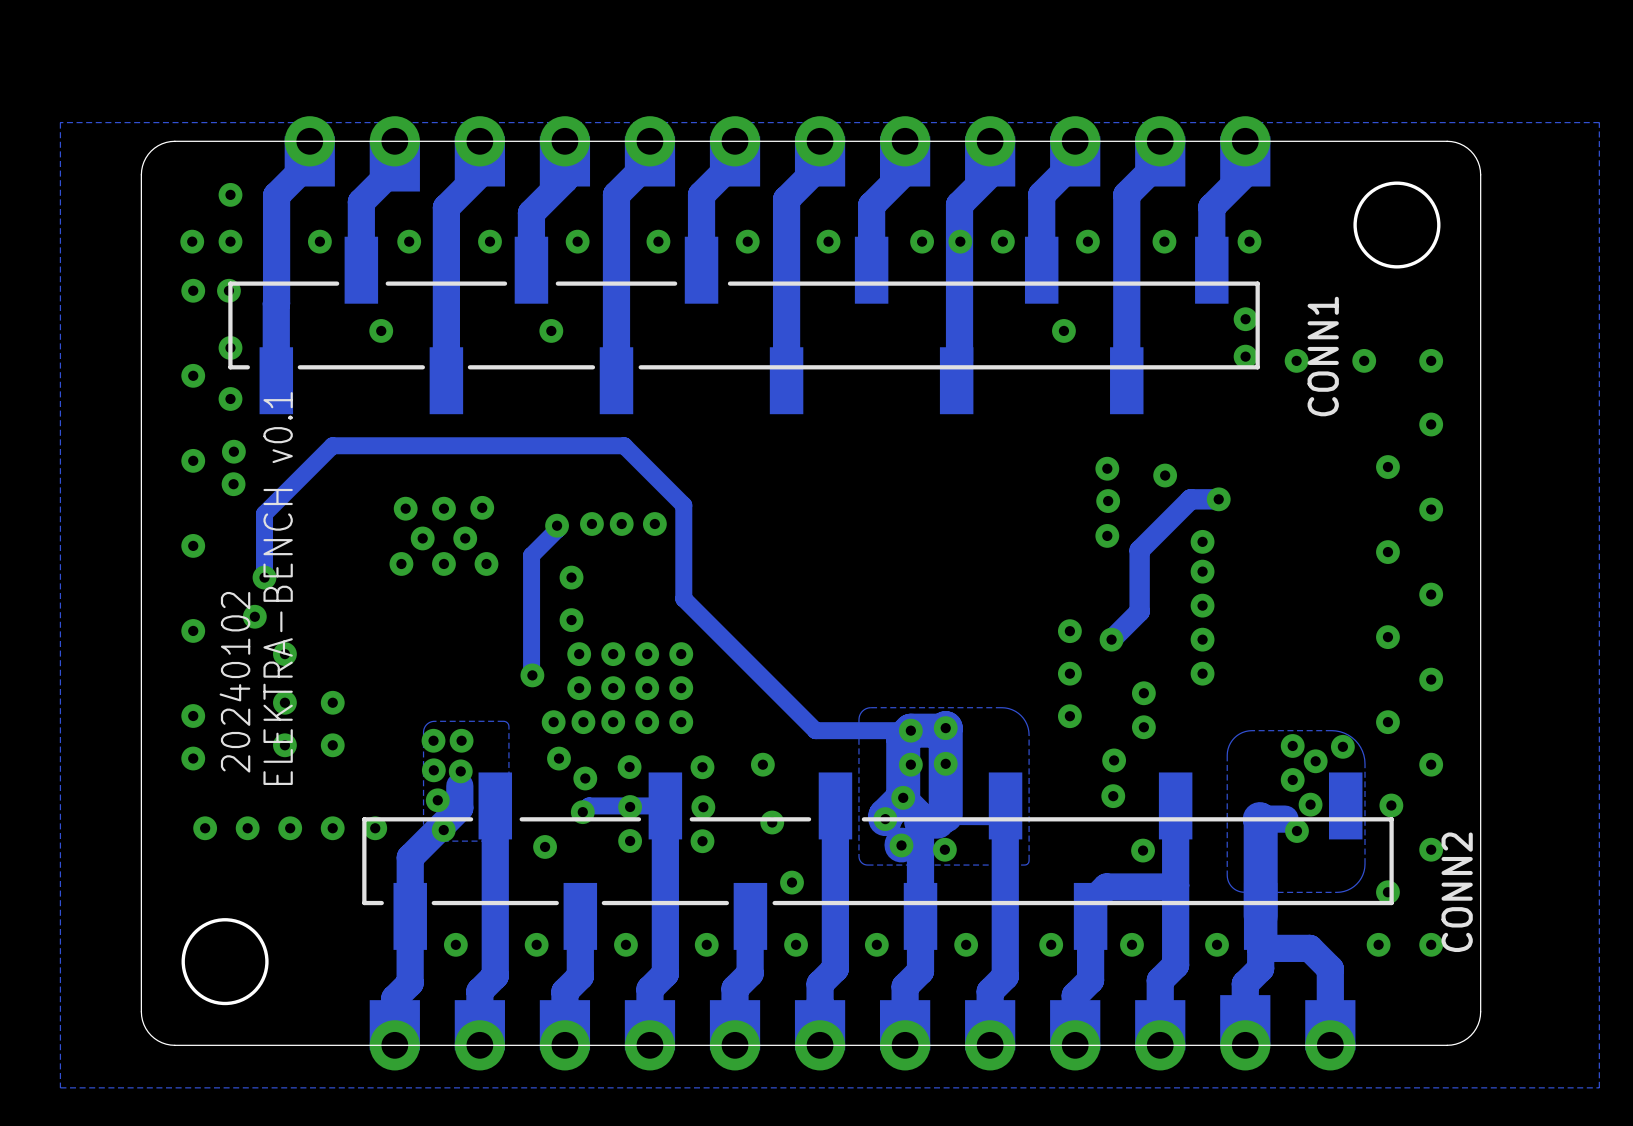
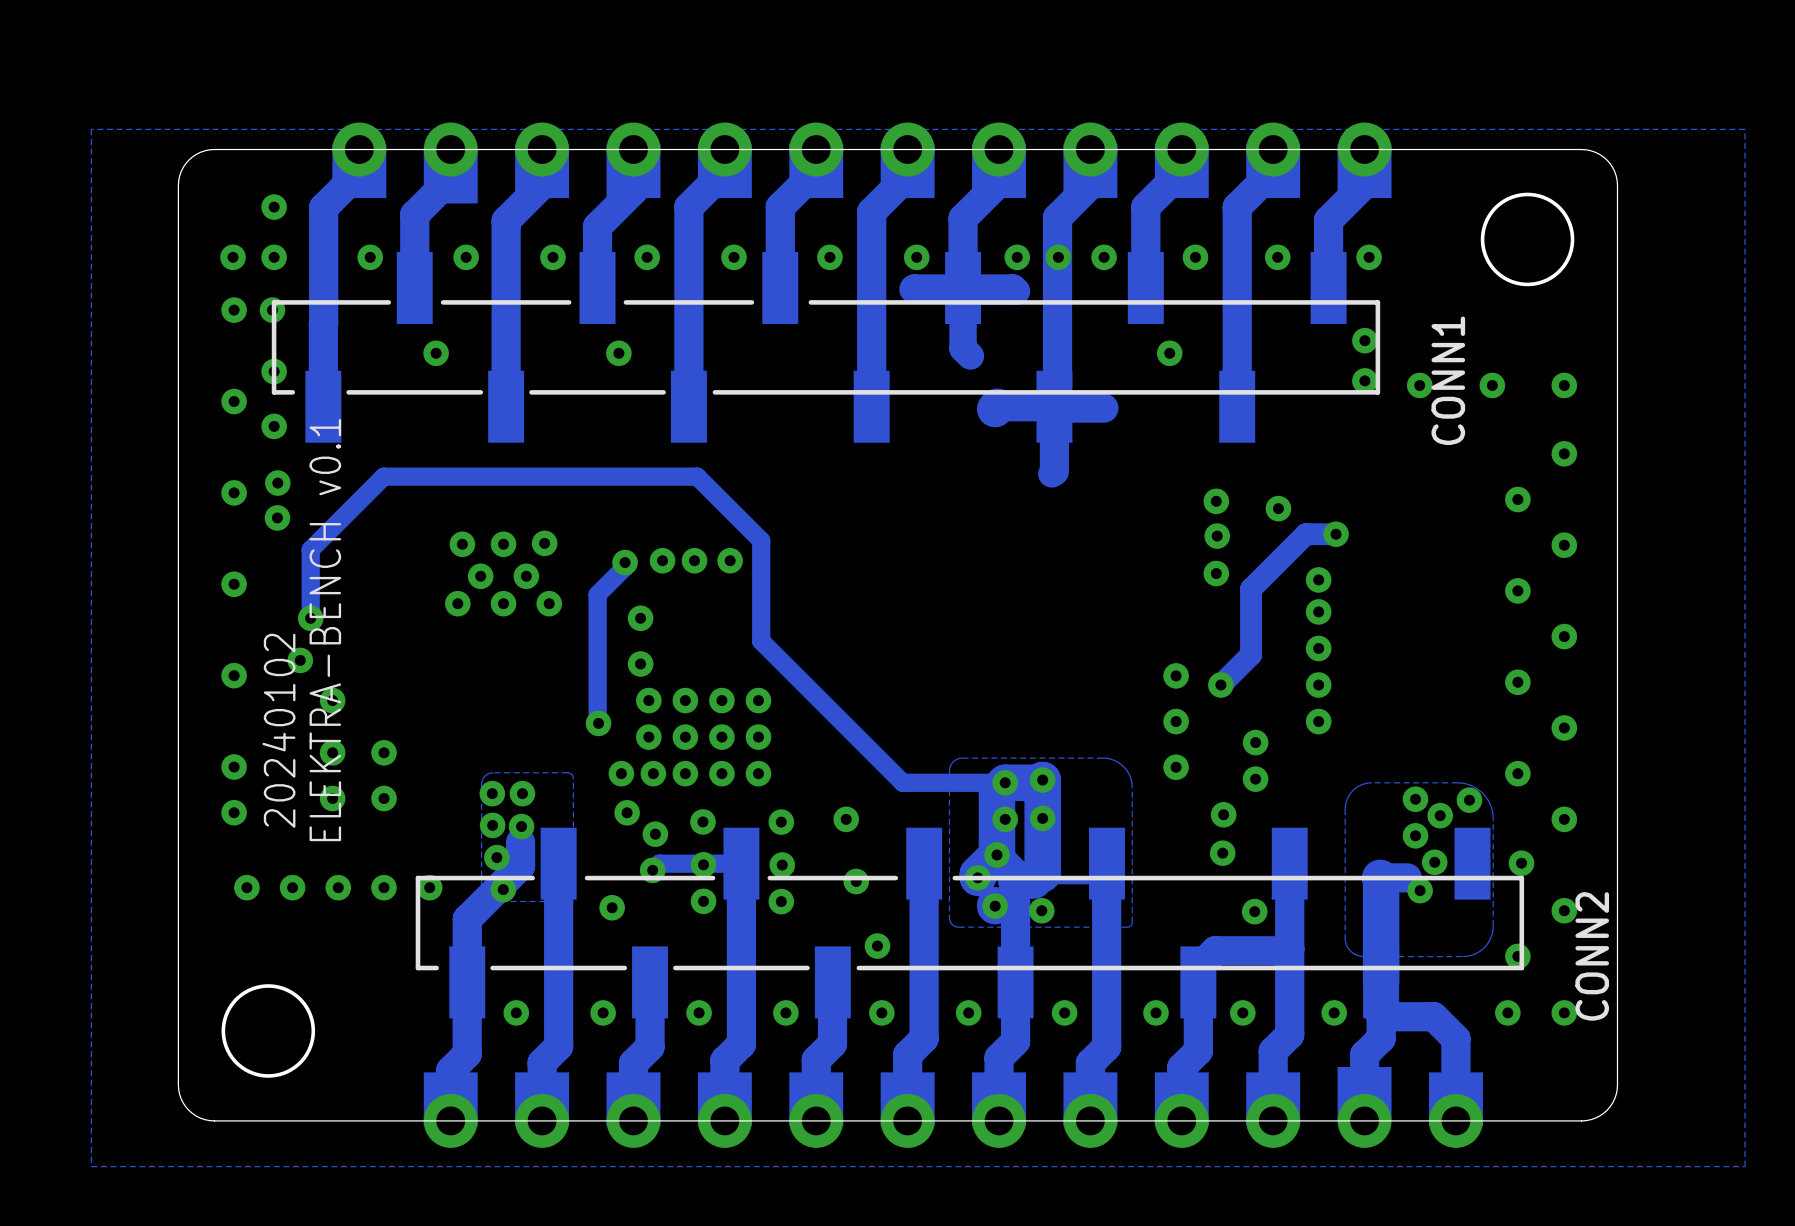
track: none -> (912, 289) (914, 288) (1013, 288) (1016, 291) (966, 291) (963, 288) (963, 348) (970, 356)
track: none -> (1054, 406) (997, 406) (995, 409)
track: none -> (1054, 406) (1054, 471) (1051, 473)
track: none -> (1054, 406) (1103, 408)

